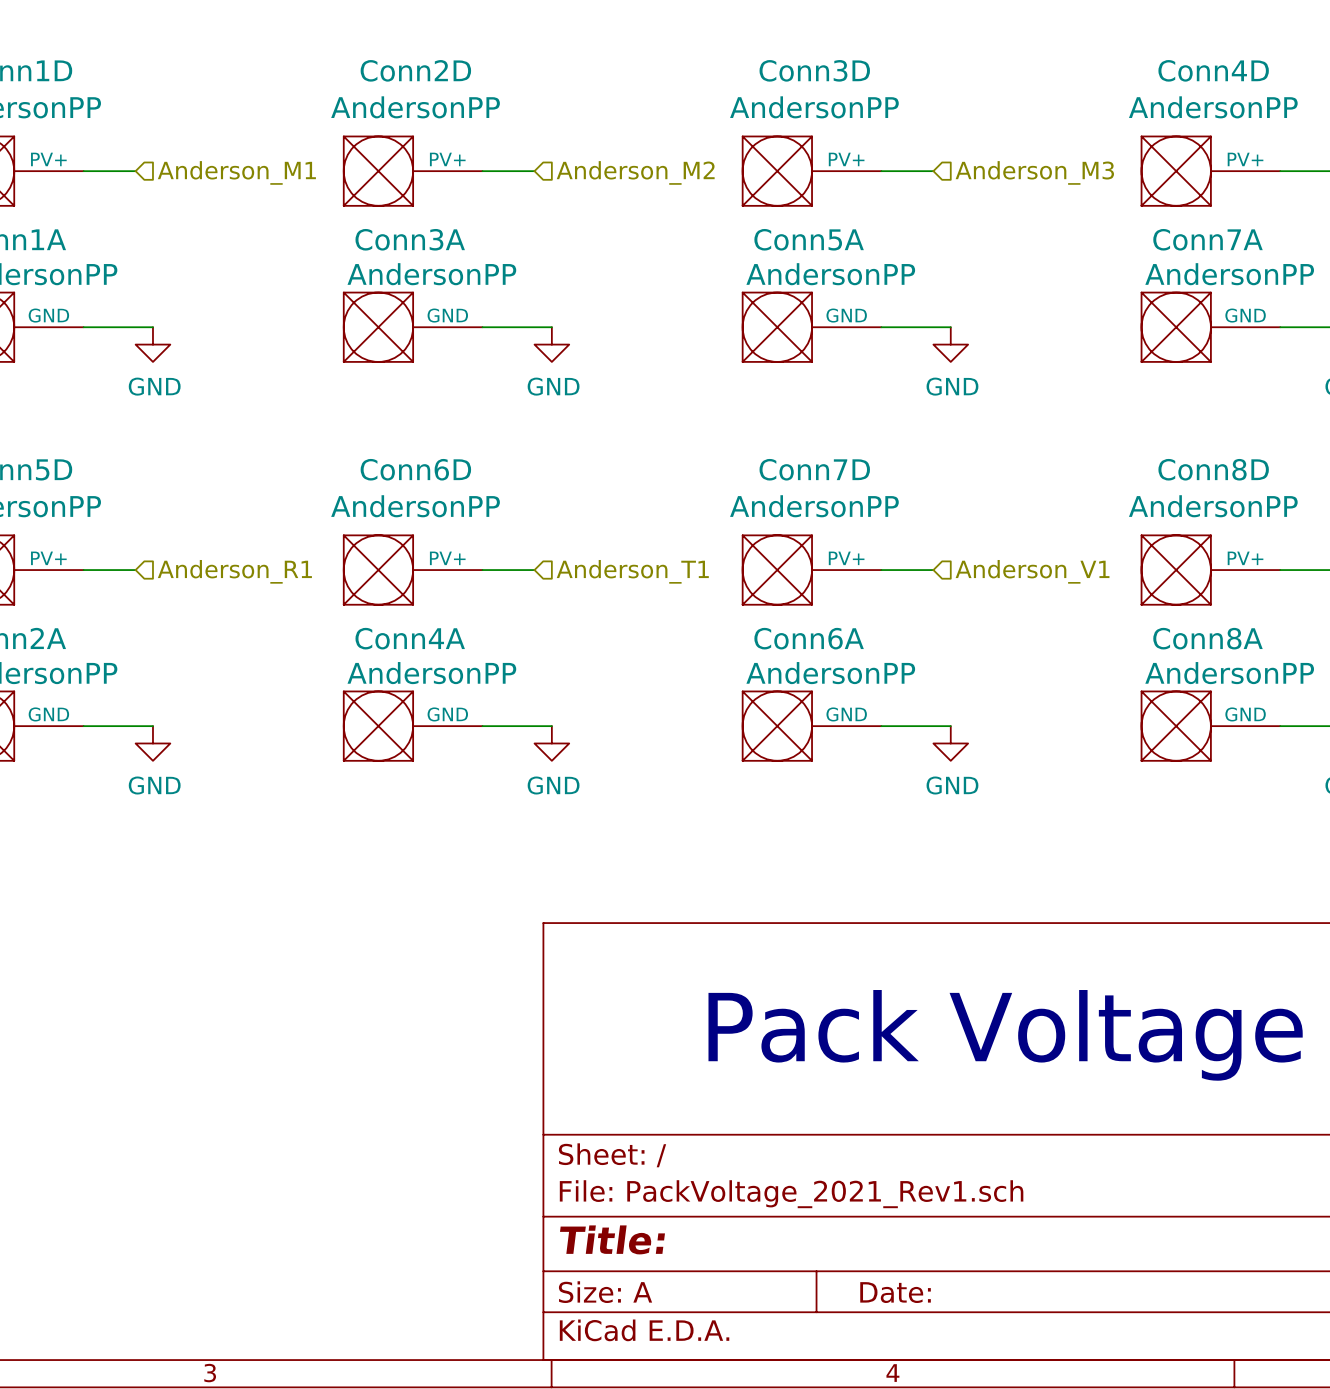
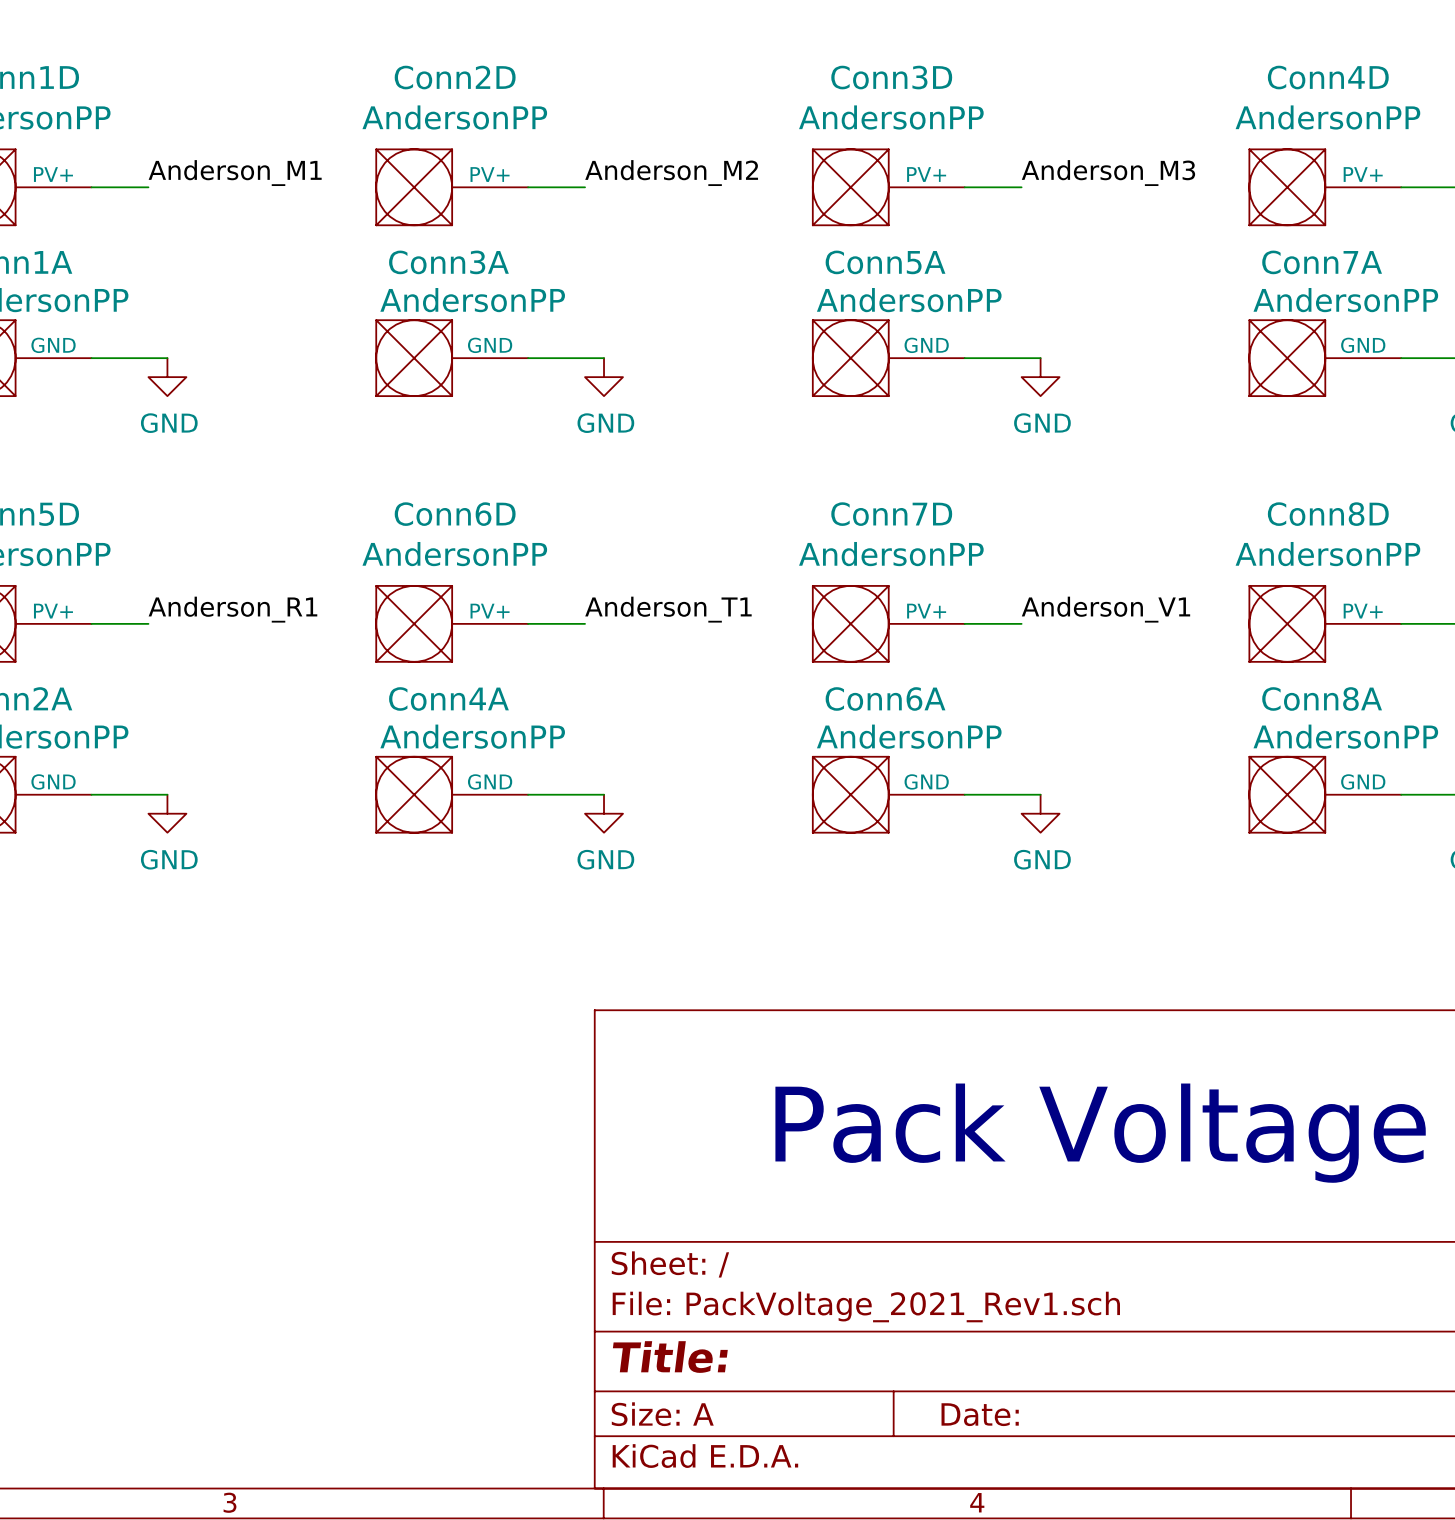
label: none -> Anderson_M1 (235, 173)
label: none -> Anderson_M2 (671, 173)
label: none -> Anderson_M3 (1108, 173)
hierarchical label: Anderson_M1 (236, 172) -> none
hierarchical label: Anderson_M2 (635, 172) -> none
hierarchical label: Anderson_M3 (1034, 172) -> none
label: none -> Anderson_R1 (232, 609)
label: none -> Anderson_T1 (668, 609)
label: none -> Anderson_V1 (1105, 609)
hierarchical label: Anderson_R1 (234, 571) -> none
hierarchical label: Anderson_T1 (632, 571) -> none
hierarchical label: Anderson_V1 (1032, 571) -> none

